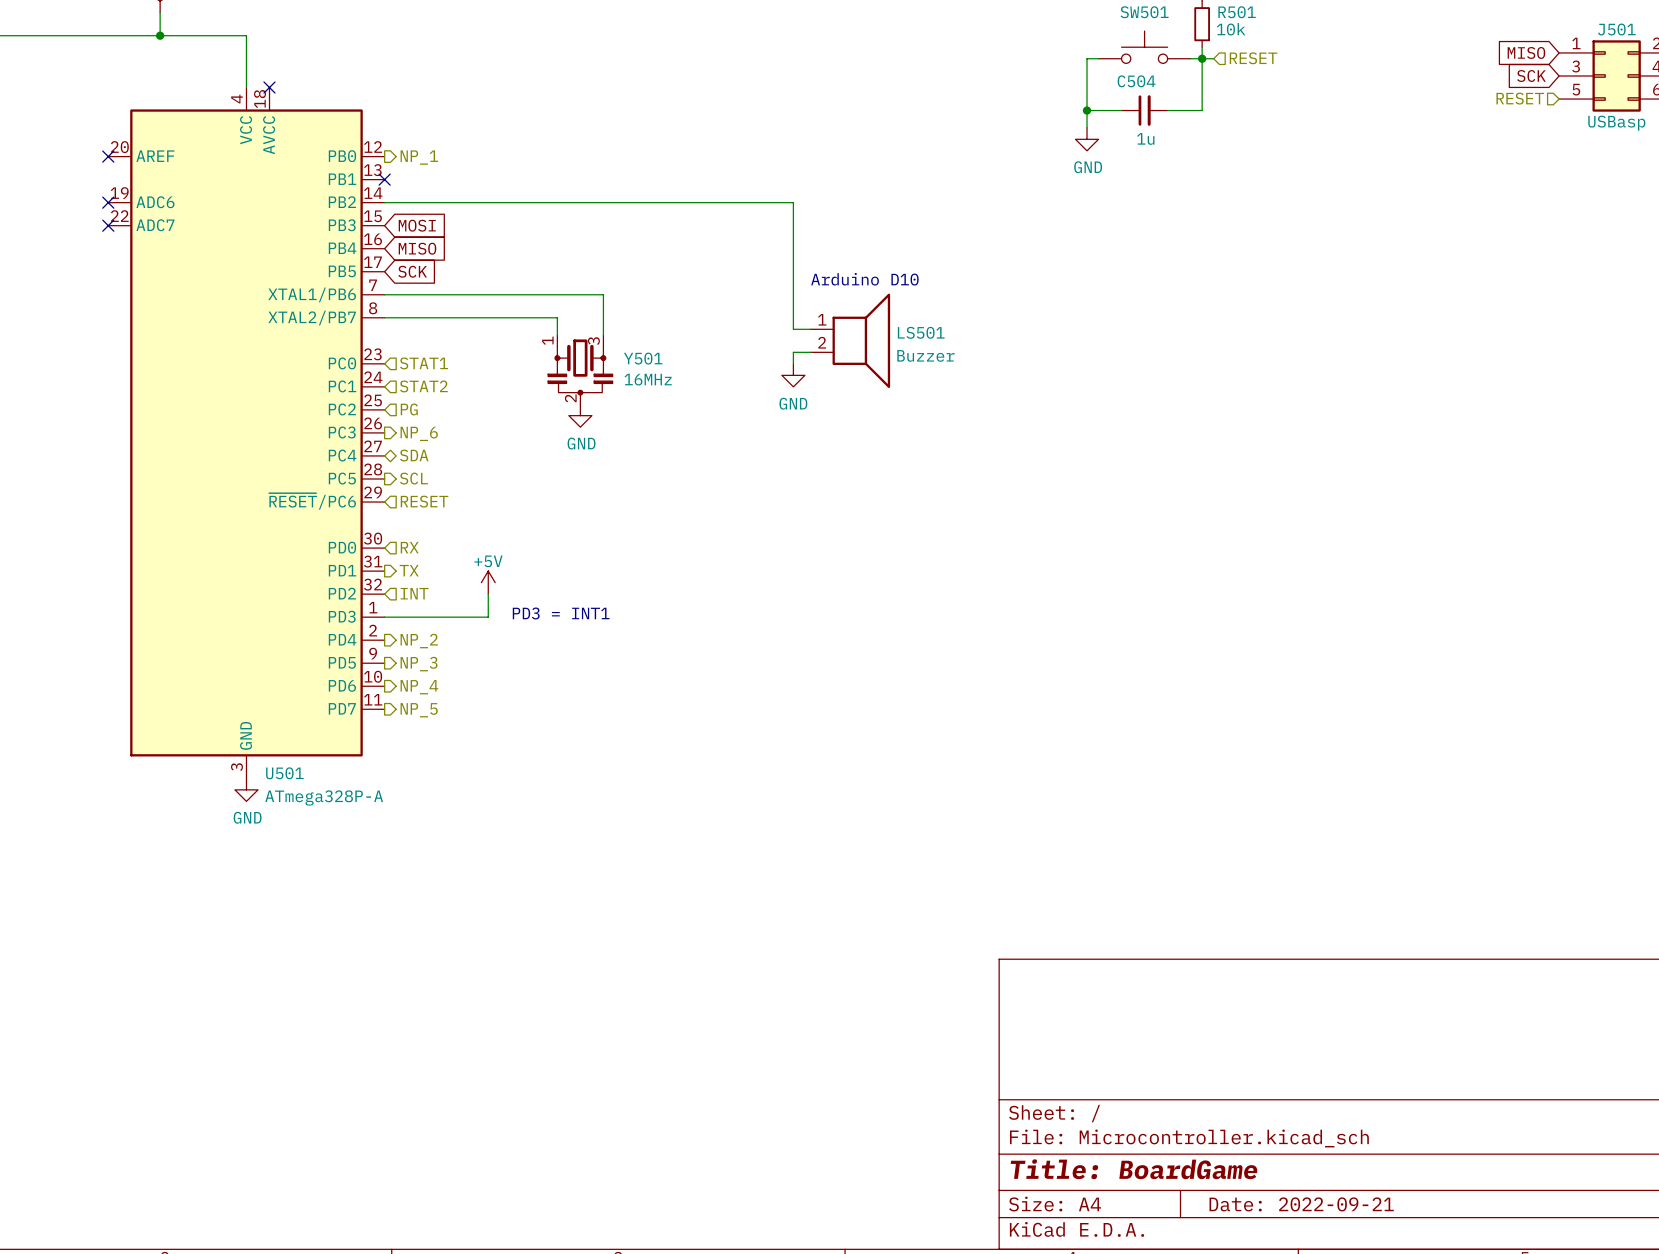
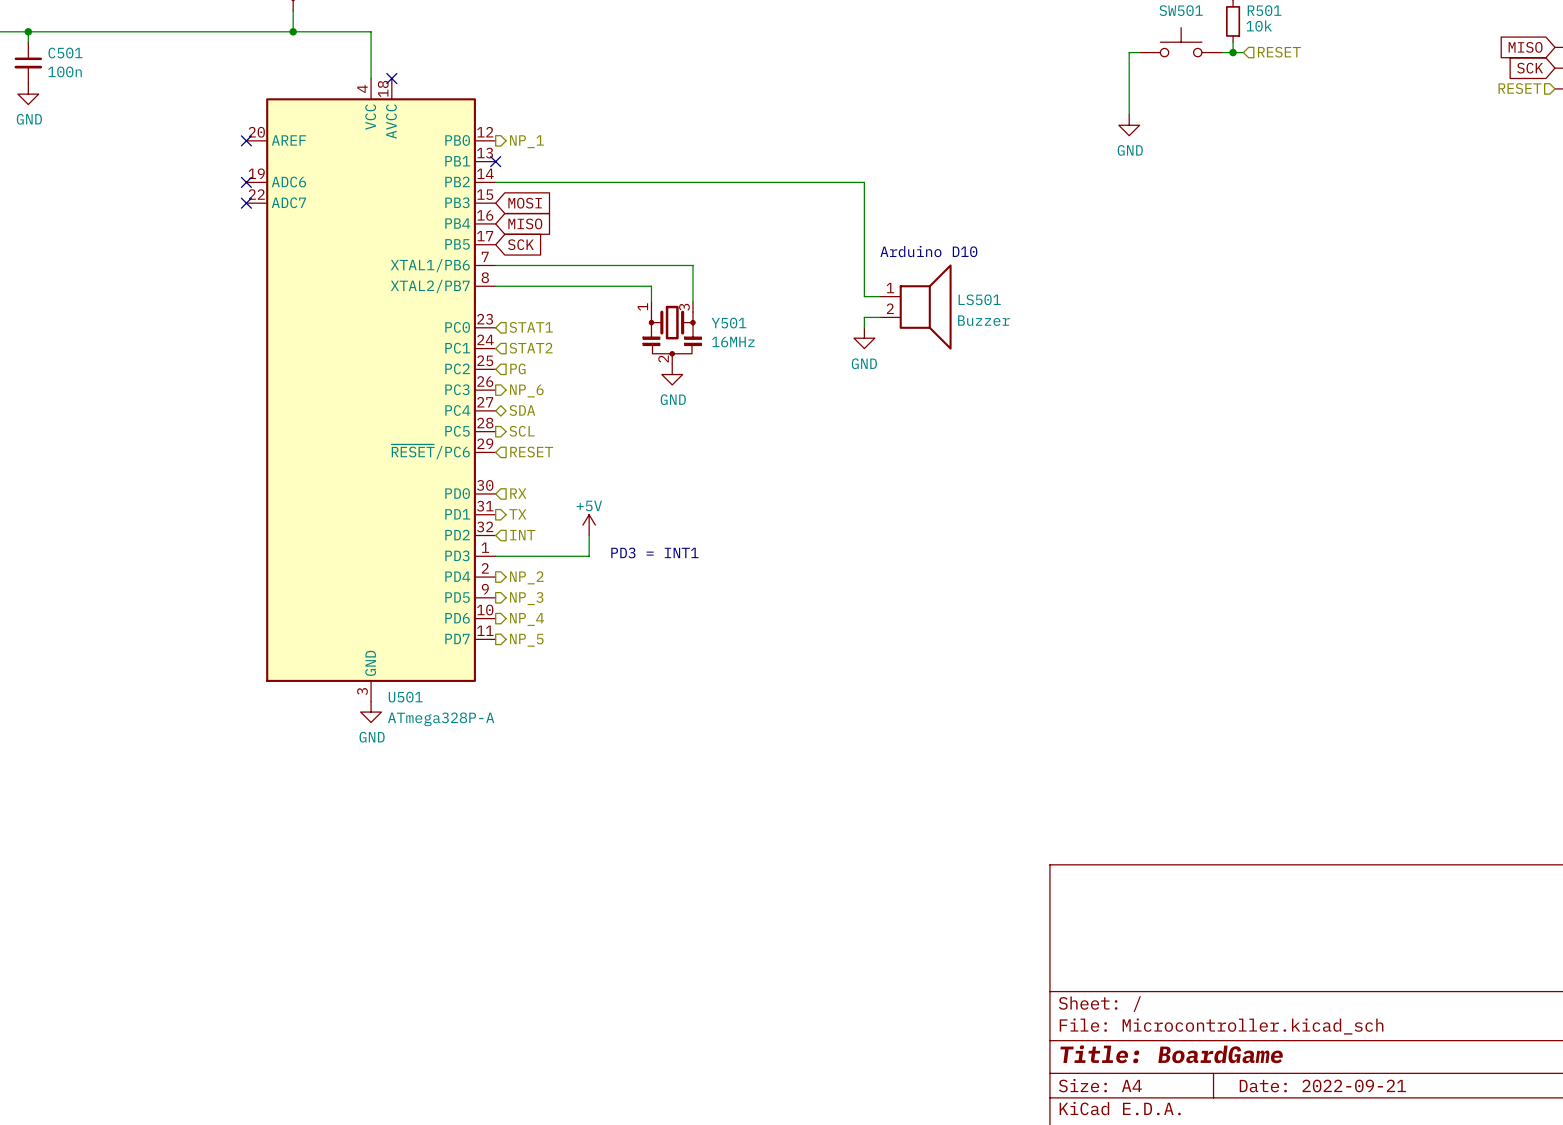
wire: (1202, 58) (1202, 110) (1167, 110) -> none
wire: (1087, 110) (1121, 110) -> none
junction: (1087, 110) -> none
C504: 1u (1144, 110) -> none

